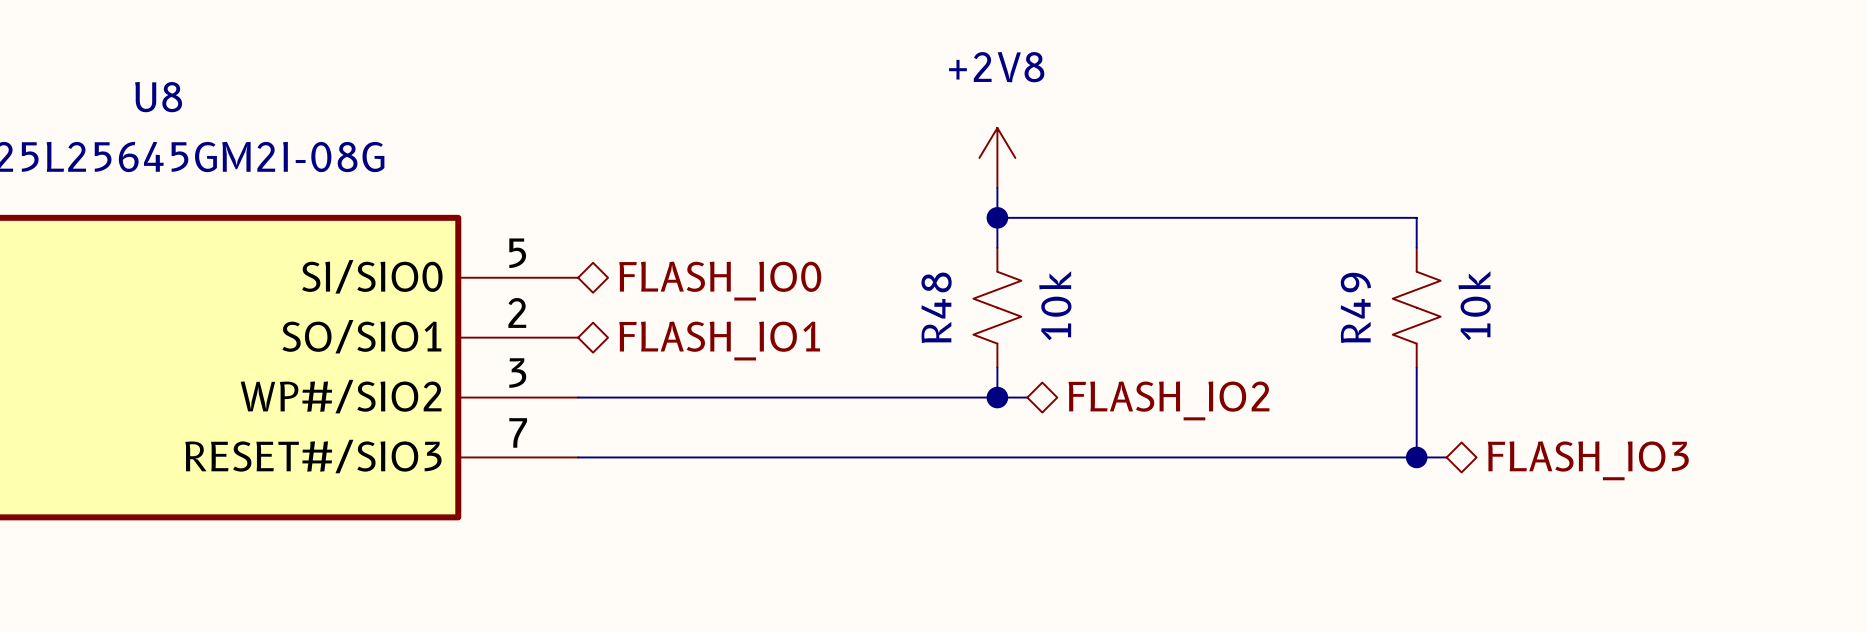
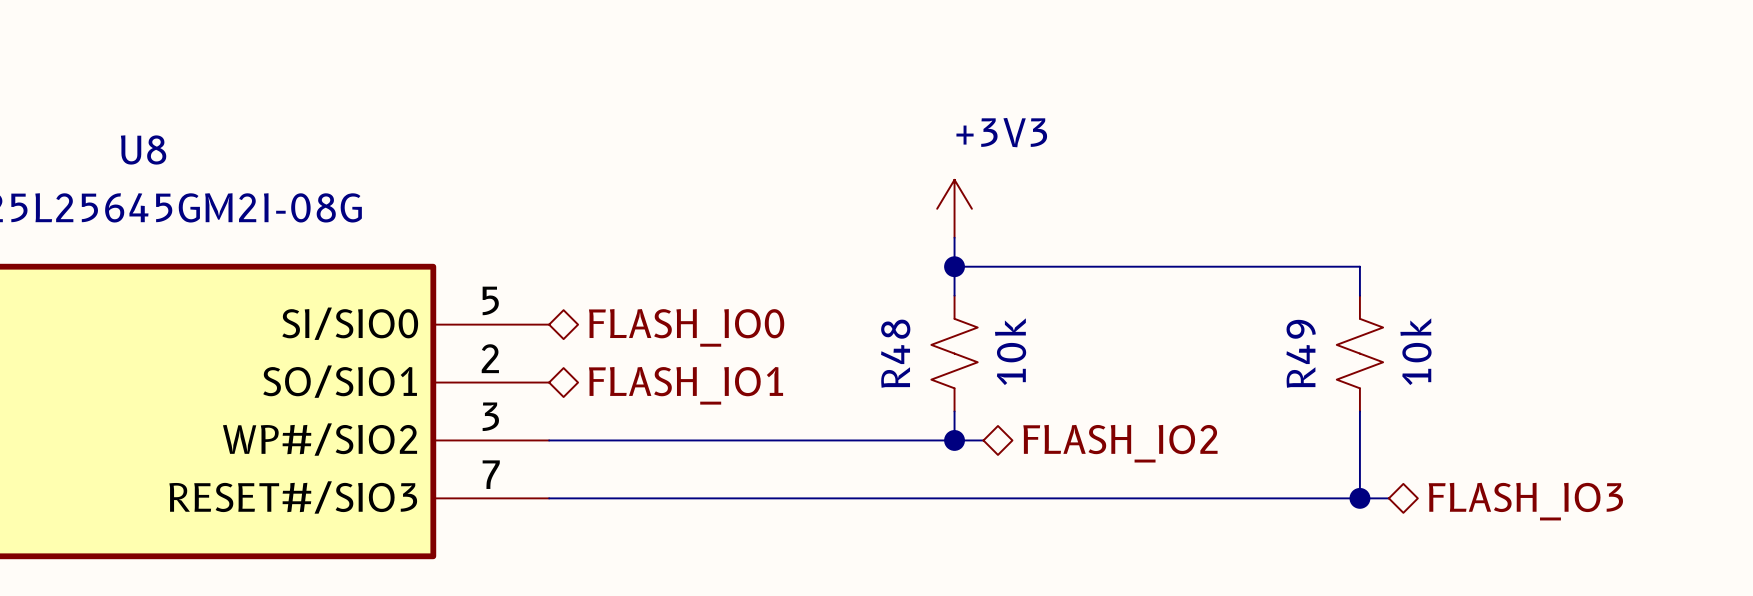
power symbol: +2V8 (997, 157) -> +3V3 (954, 208)

